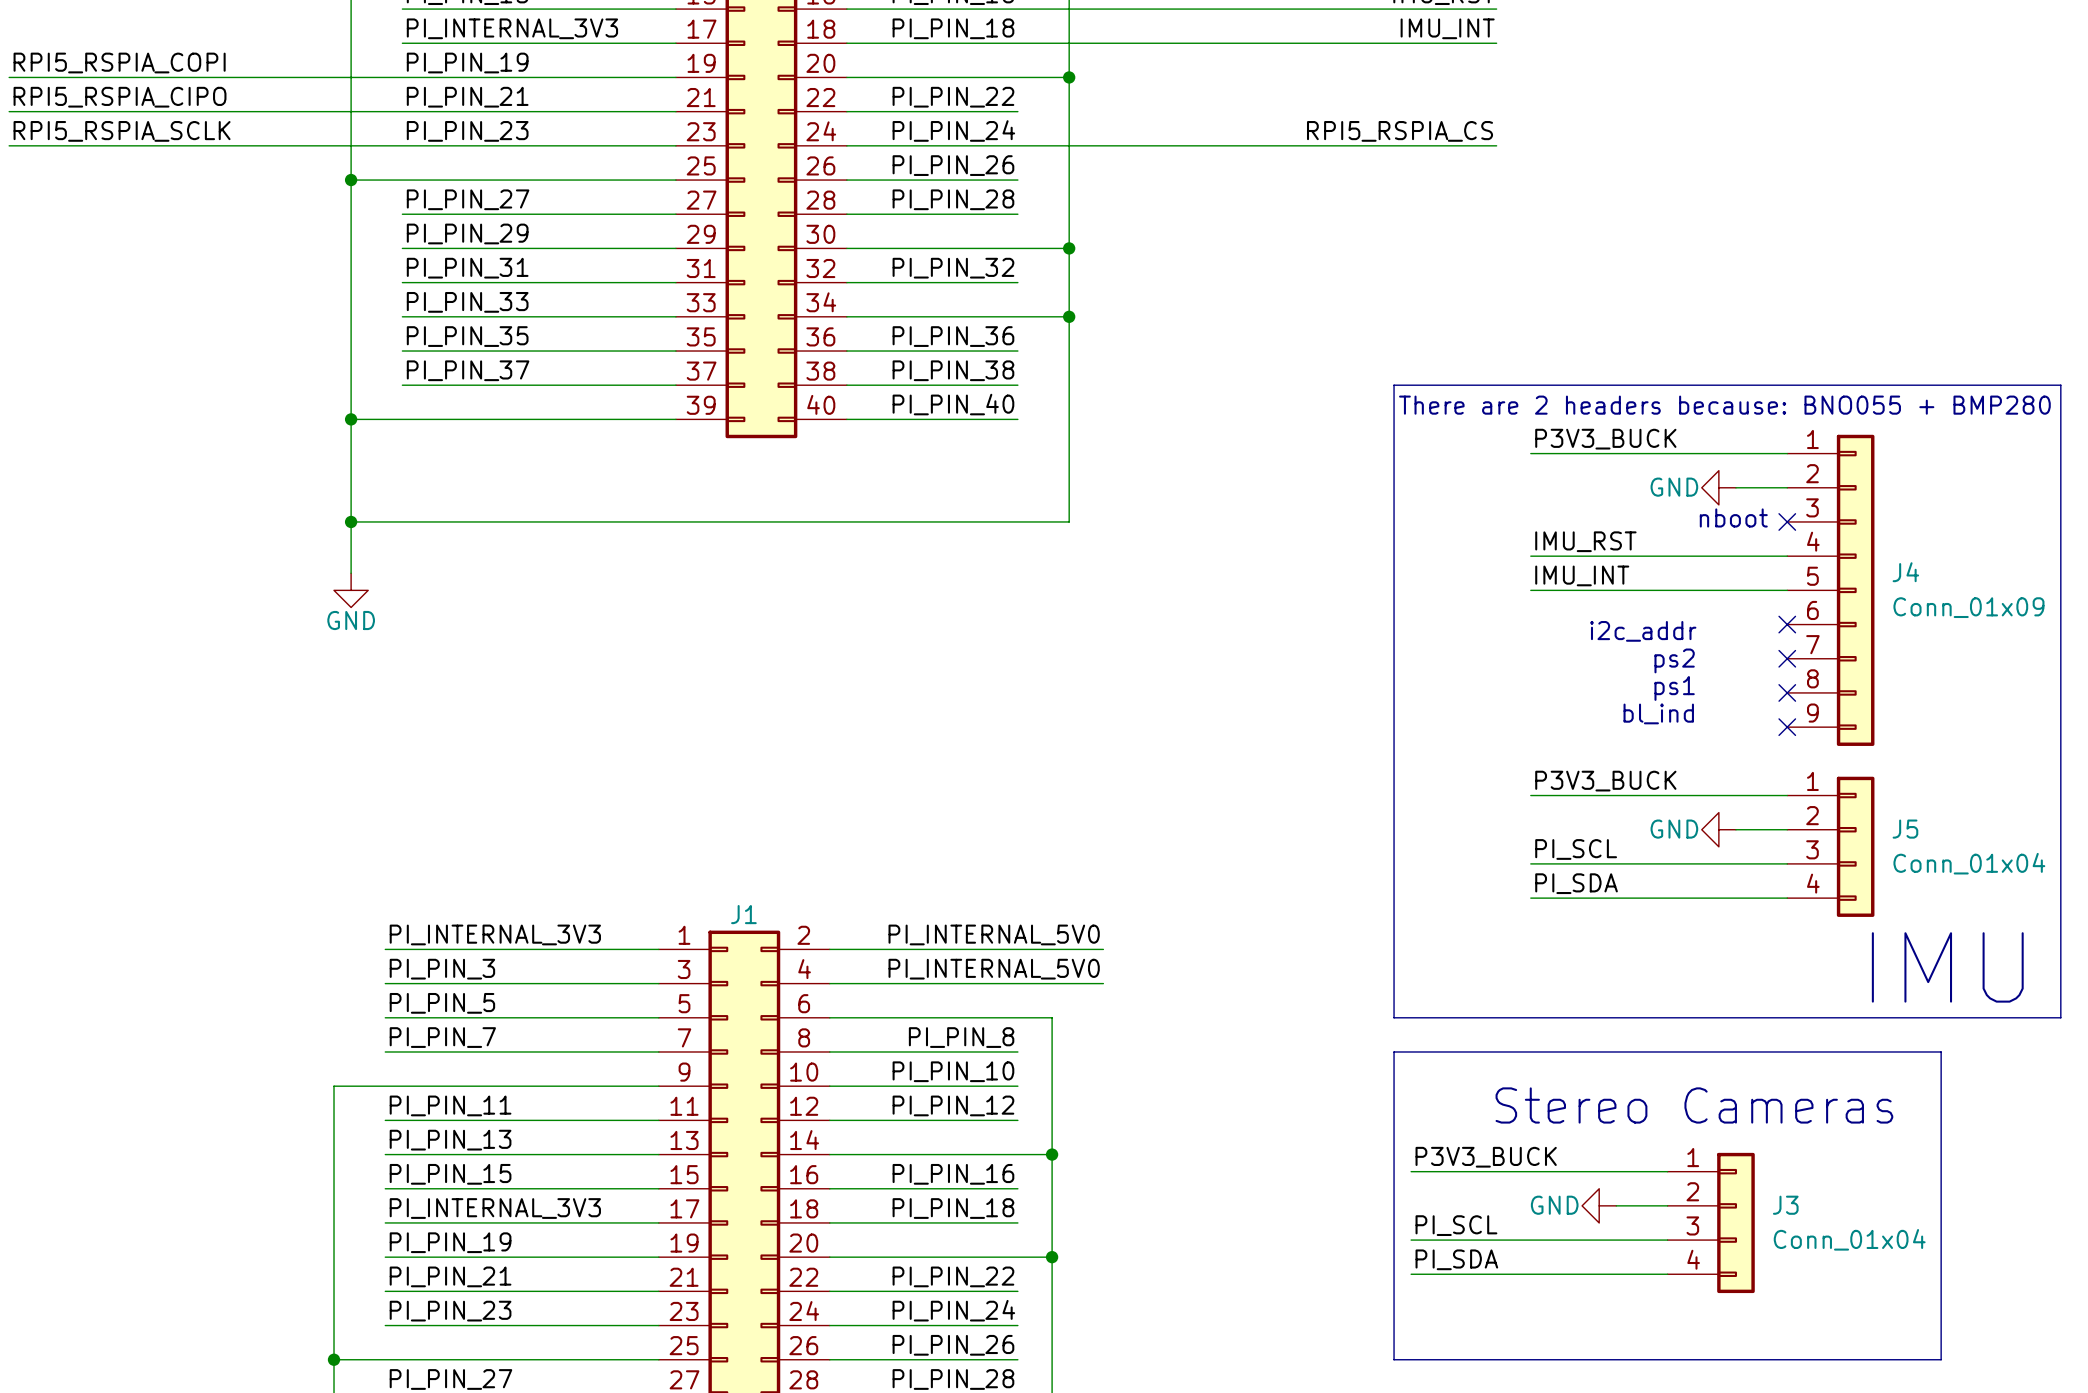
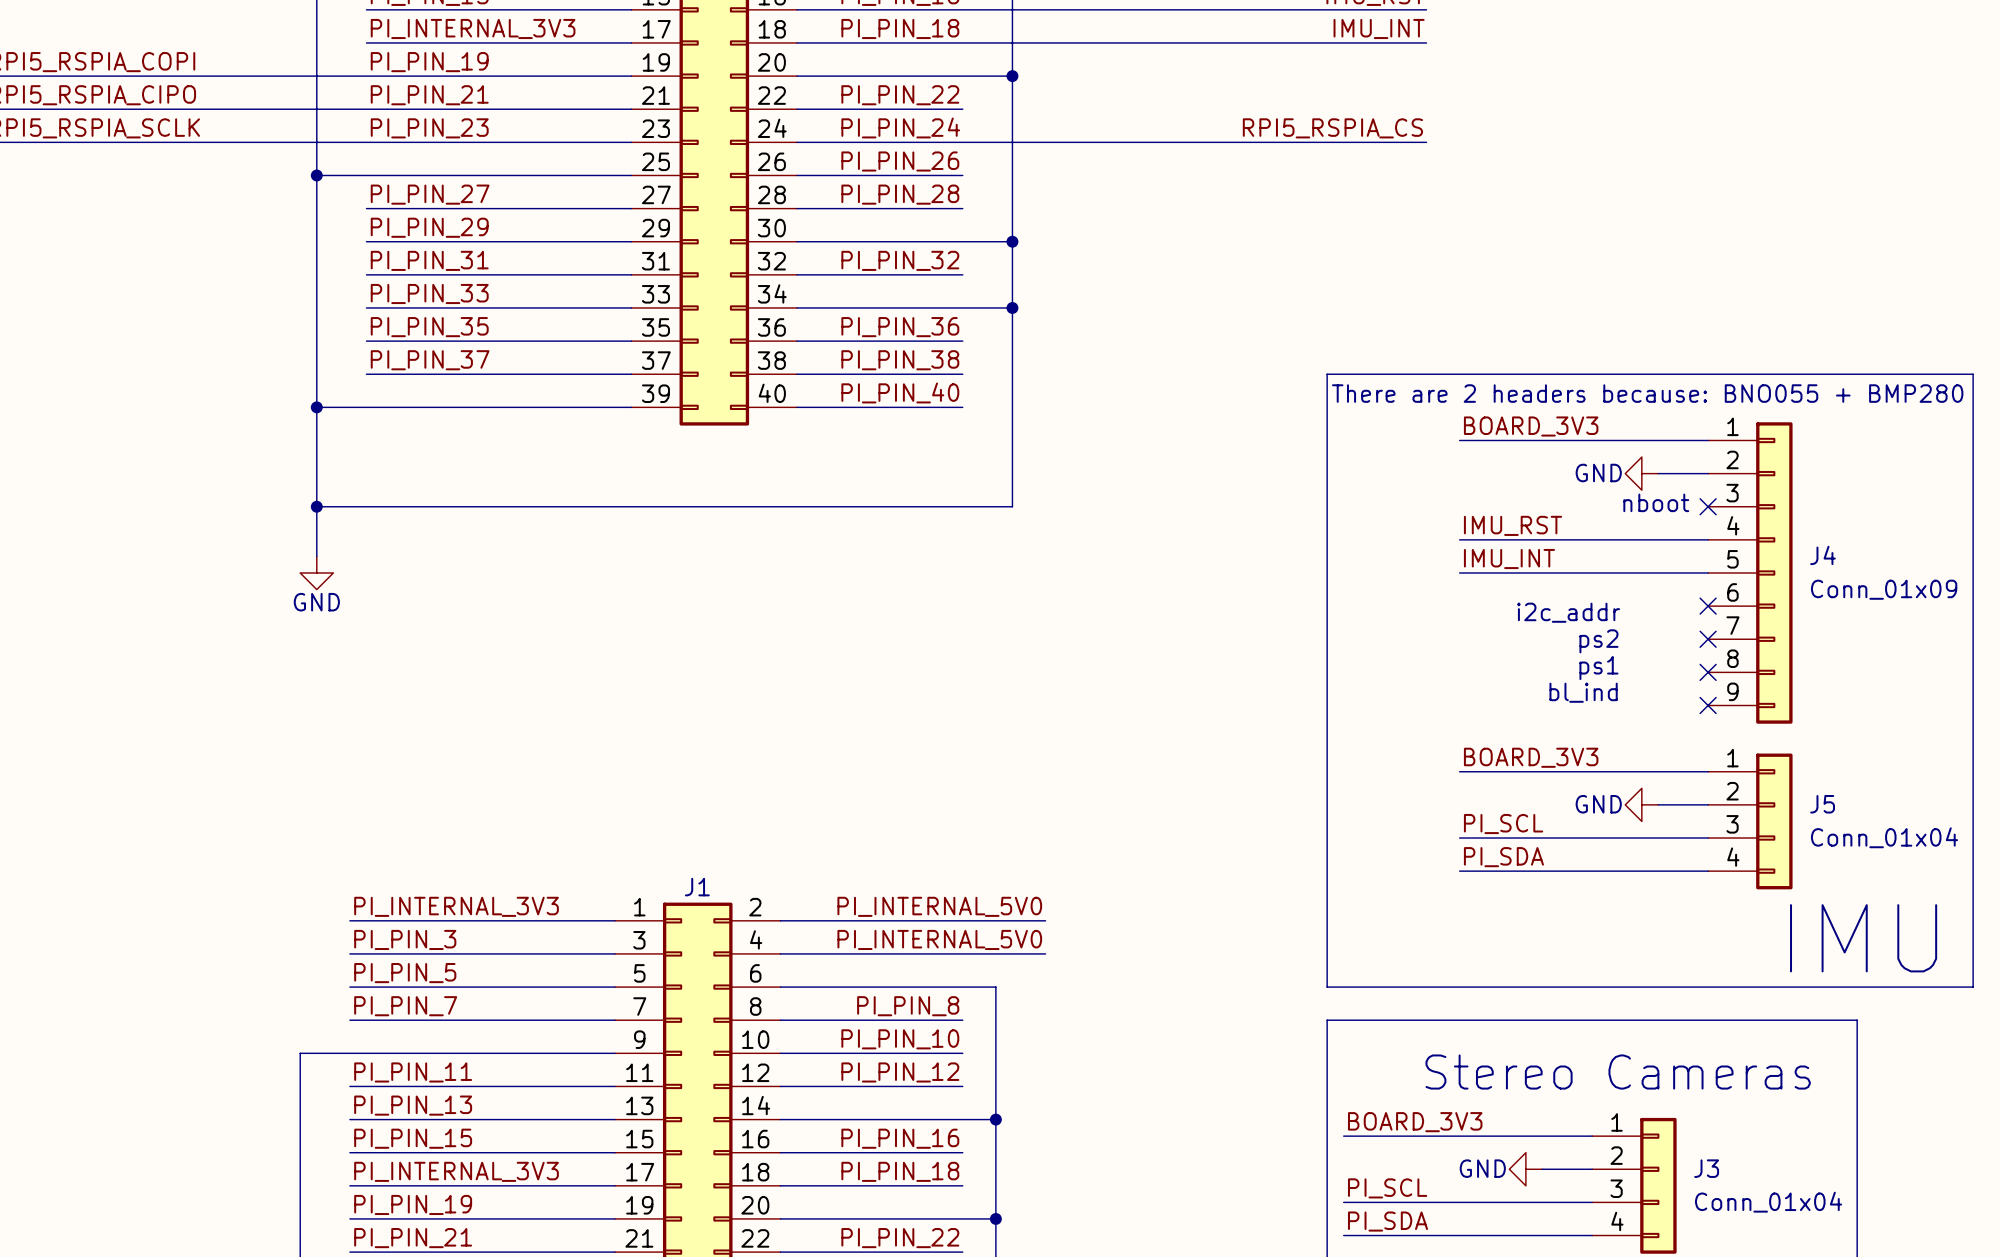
label: P3V3_BUCK (1605, 439) -> BOARD_3V3 (1531, 426)
label: P3V3_BUCK (1605, 781) -> BOARD_3V3 (1531, 757)
label: P3V3_BUCK (1486, 1157) -> BOARD_3V3 (1415, 1122)

